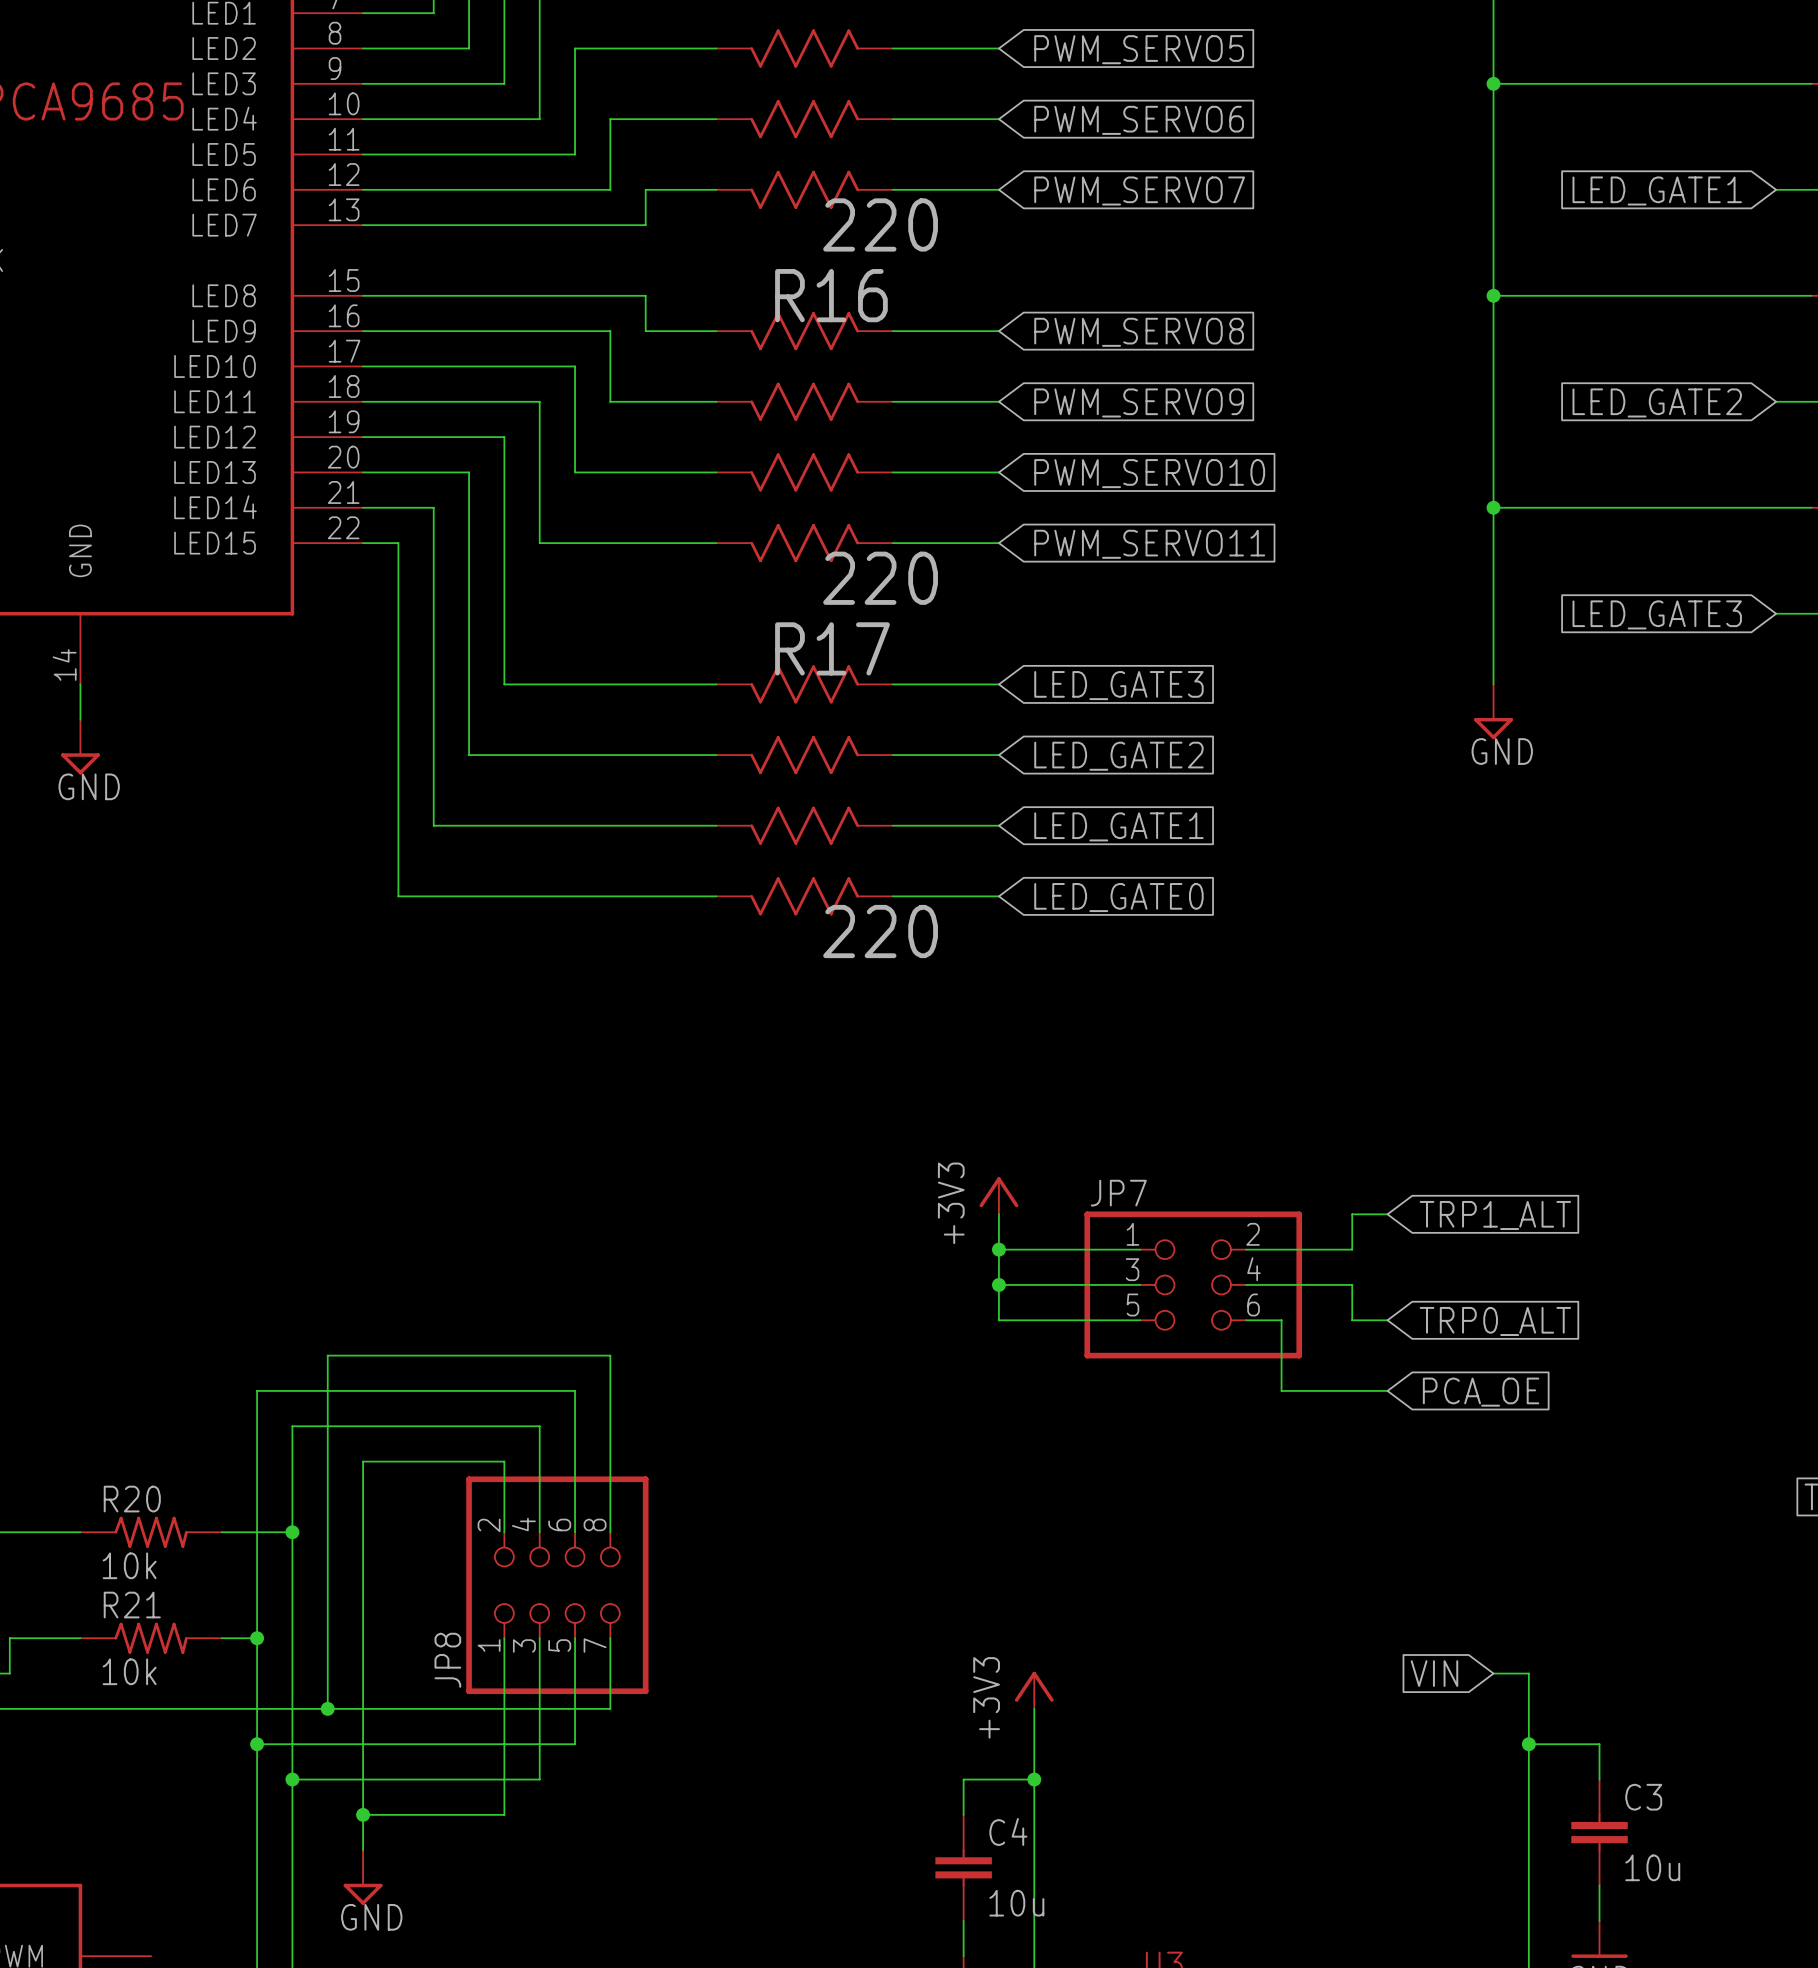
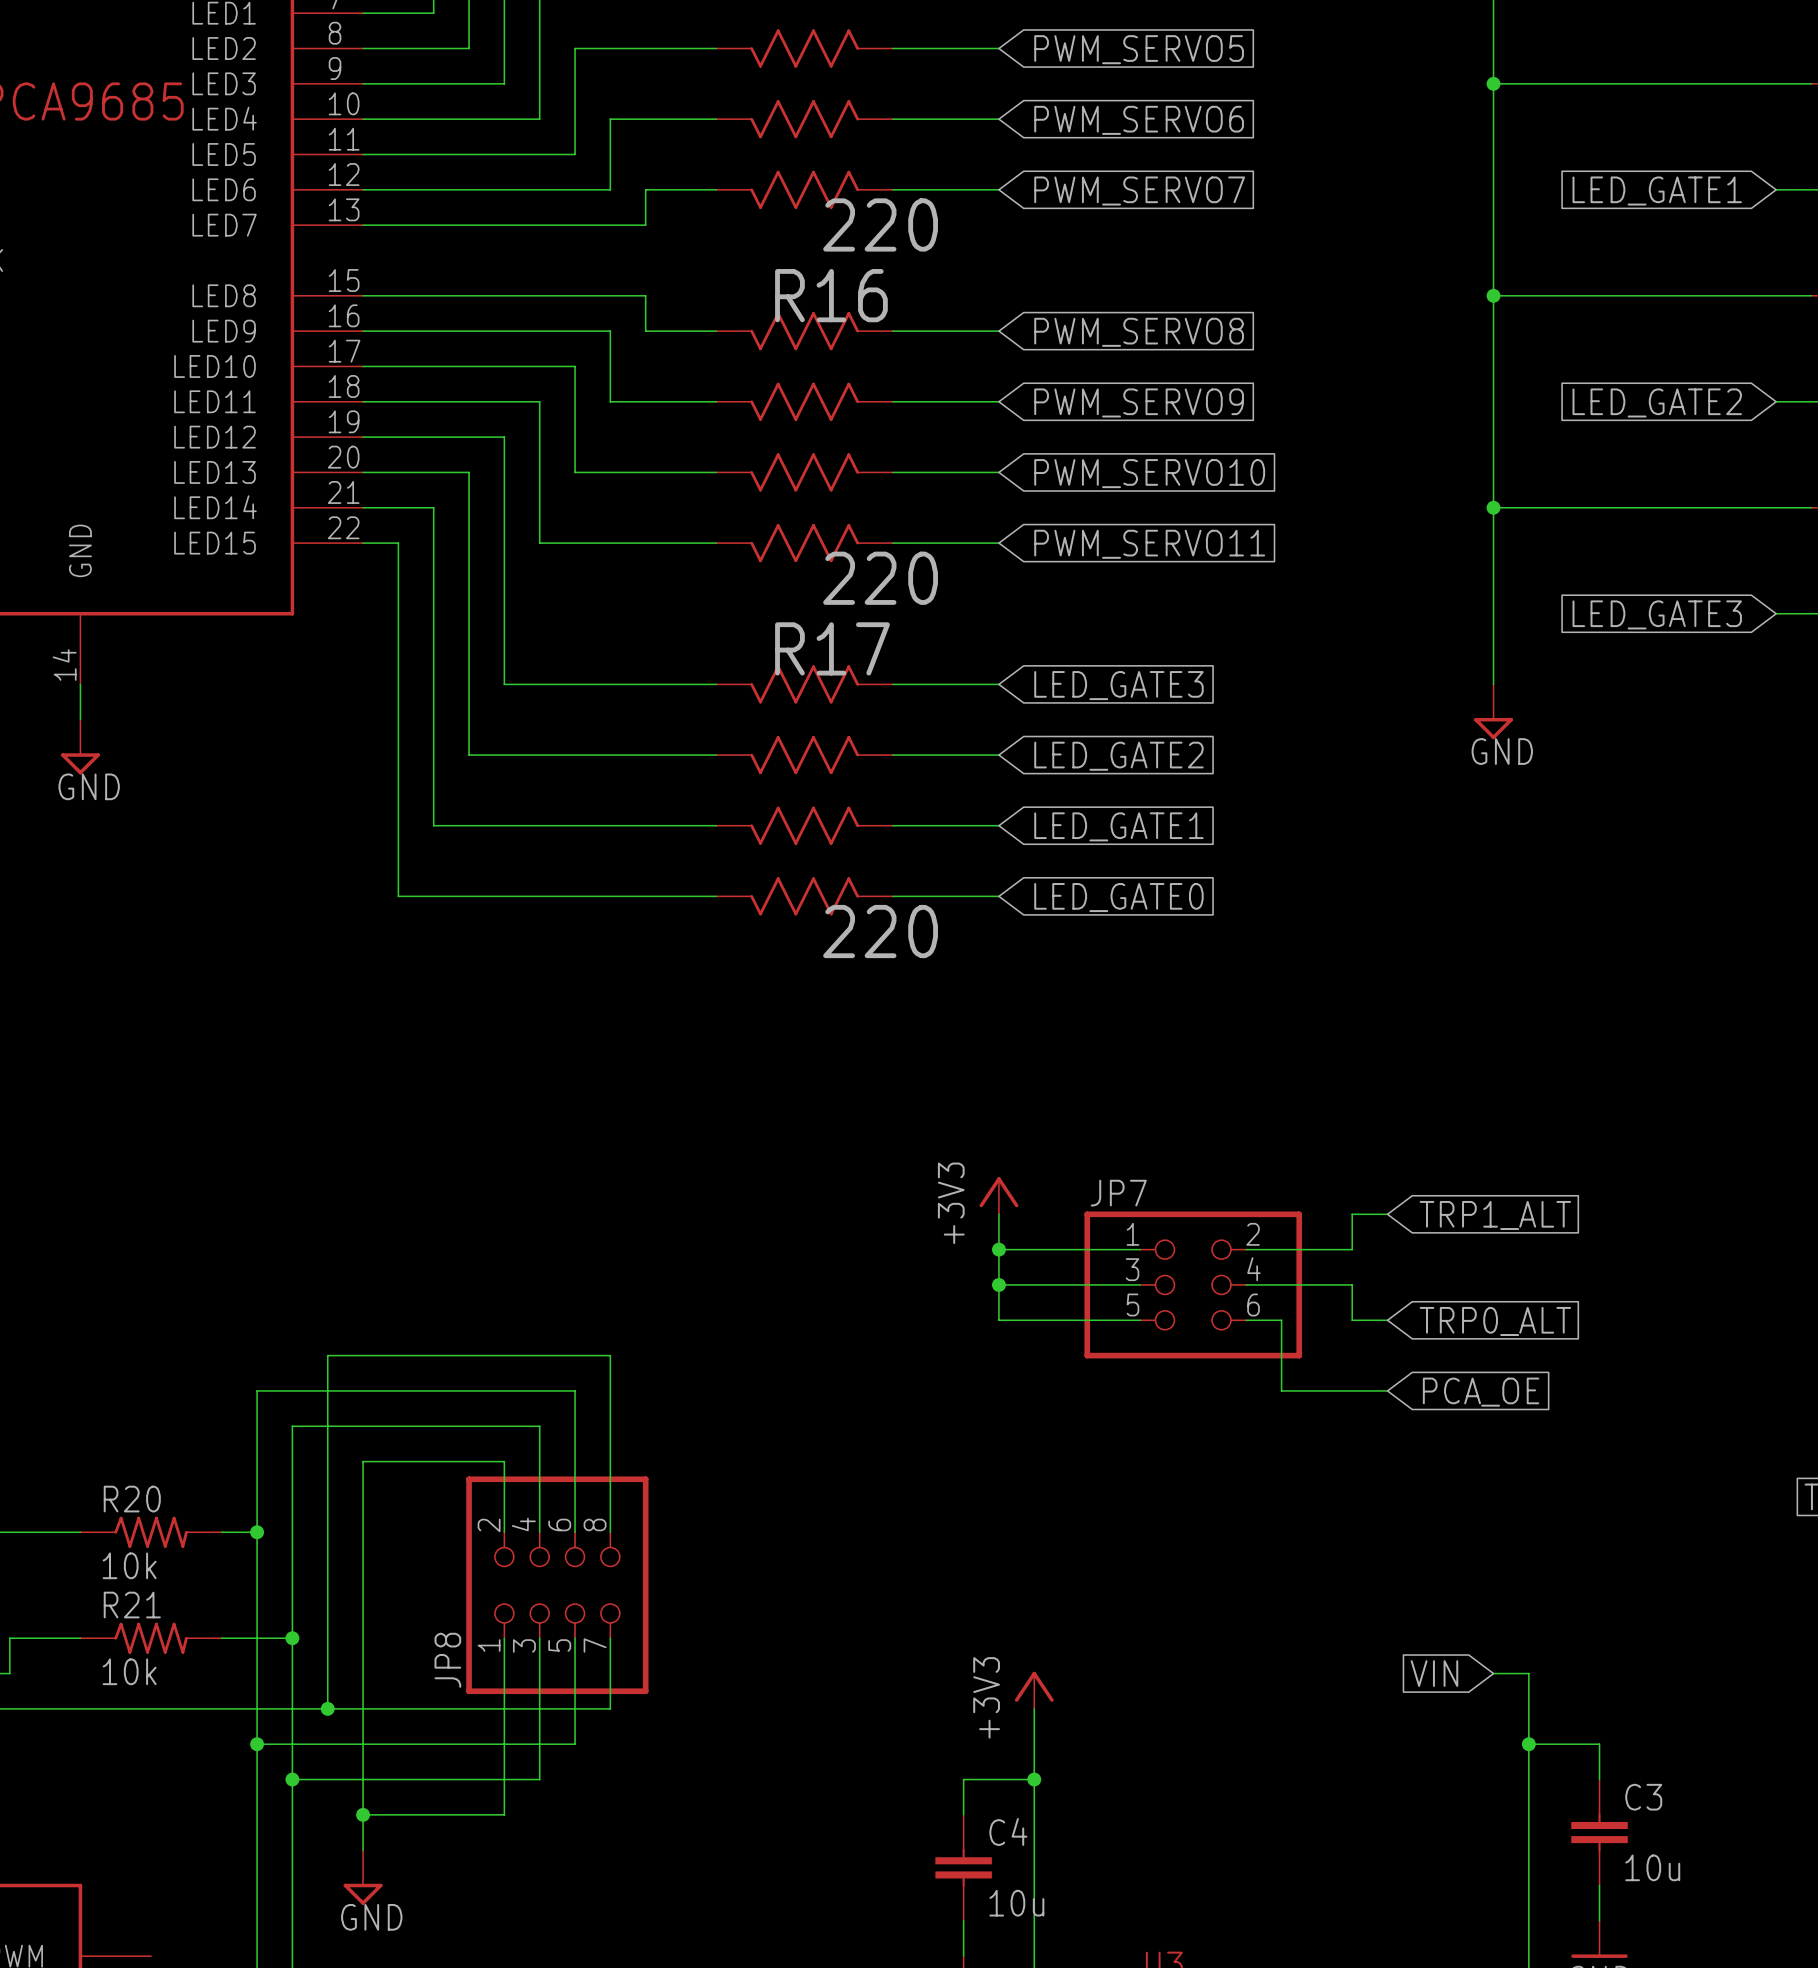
wire: (257, 1532) (292, 1532) -> (257, 1638) (292, 1638)
junction position: (292, 1532) -> (257, 1532)
junction position: (257, 1638) -> (292, 1638)

